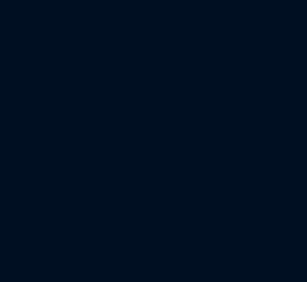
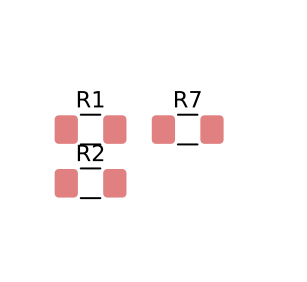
R1: none -> (90, 129)
R7: none -> (187, 129)
R2: none -> (90, 183)

